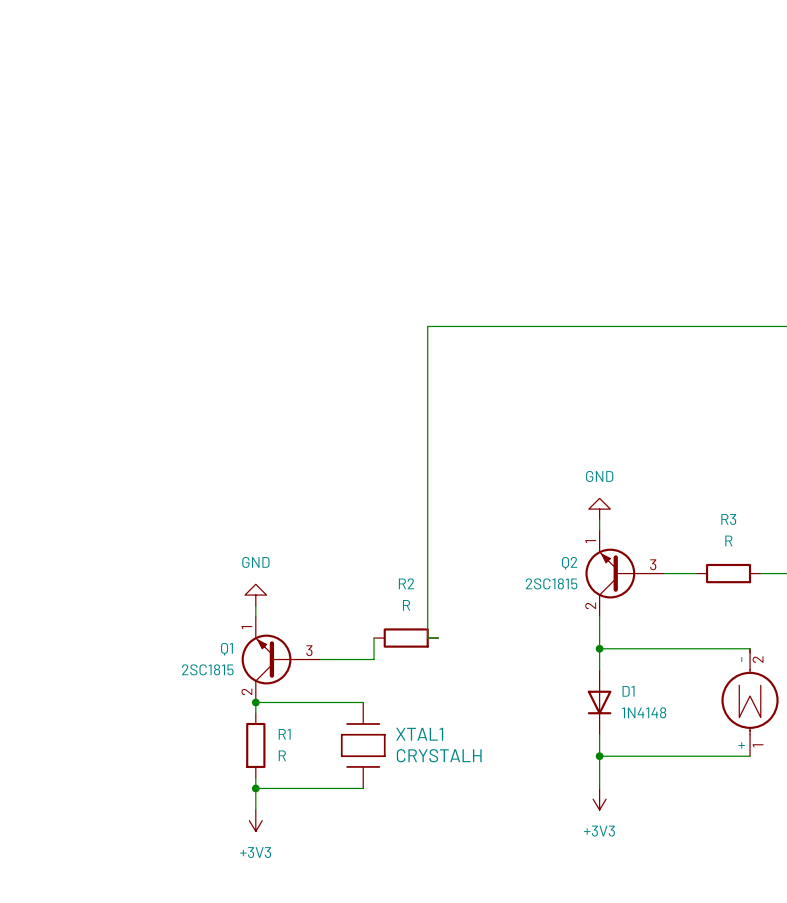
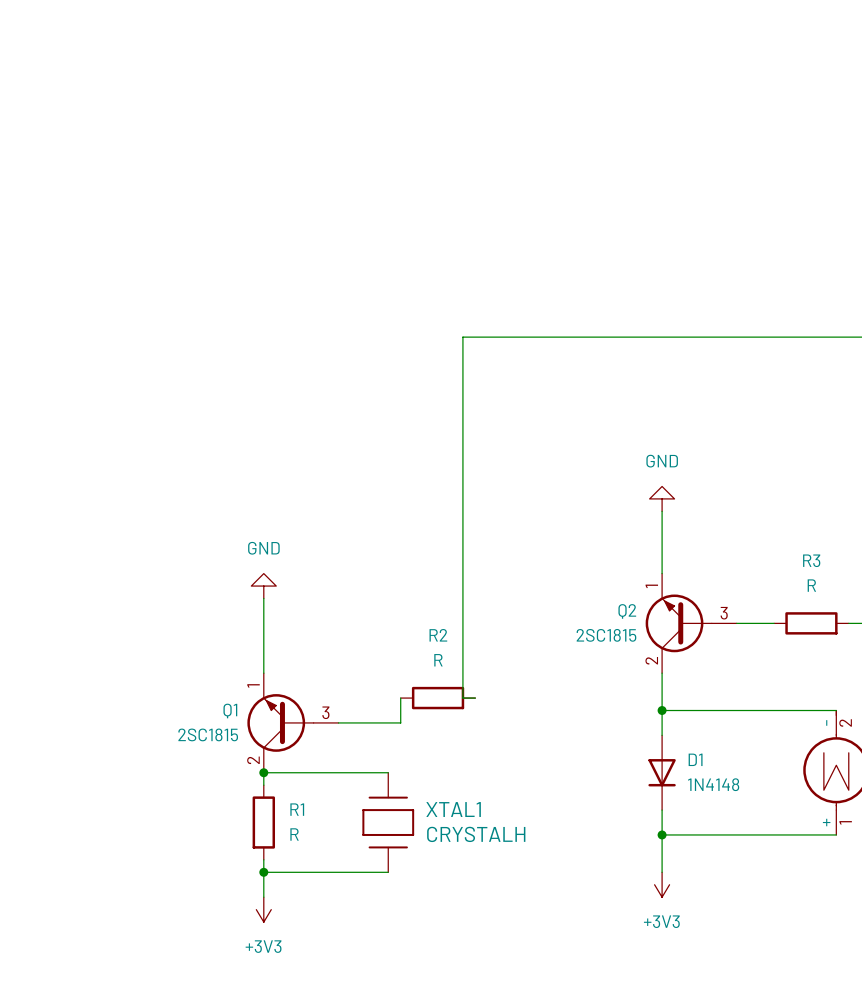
wire: none -> (662, 511) (662, 561)
power symbol position: GND (599, 509) -> GND (662, 498)
wire: none -> (263, 598) (263, 660)
power symbol position: GND (255, 595) -> GND (263, 586)

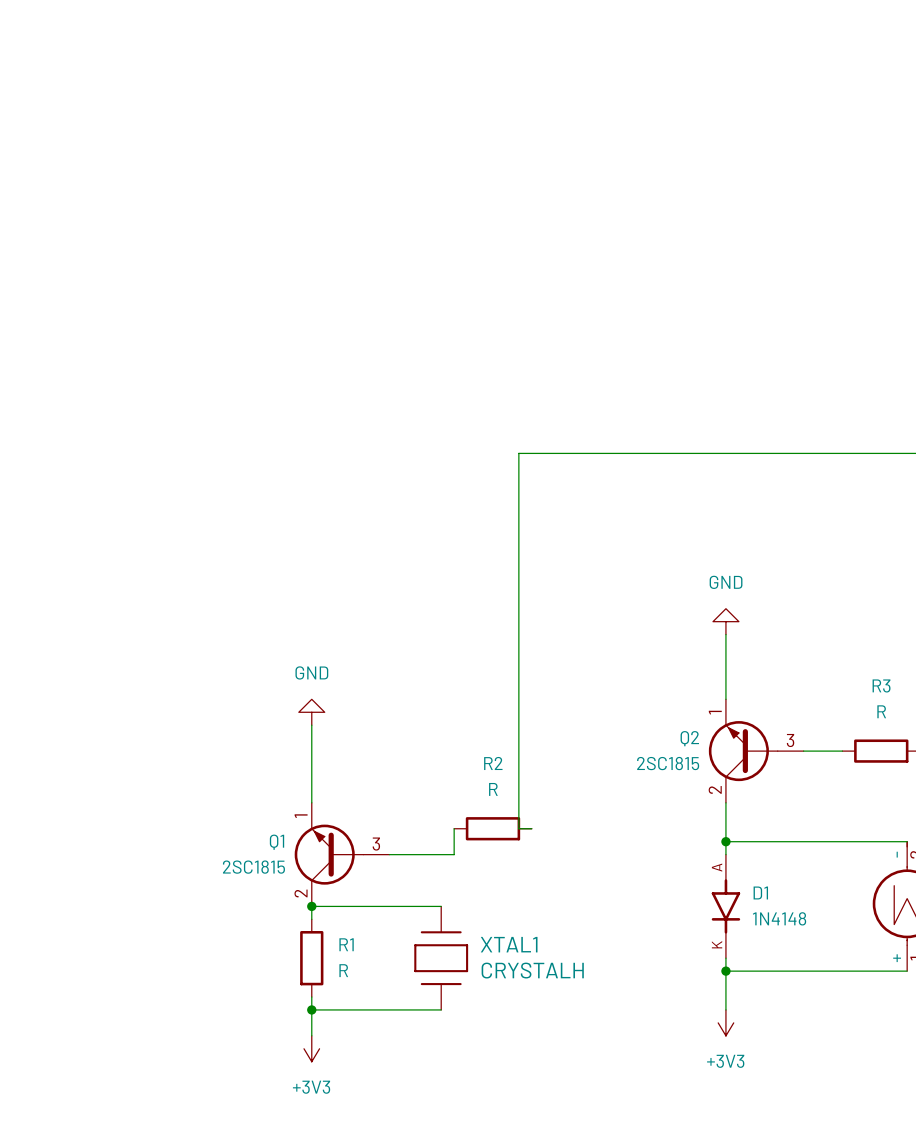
D1 symbol: [648, 735, 676, 811] -> [711, 854, 741, 959]

